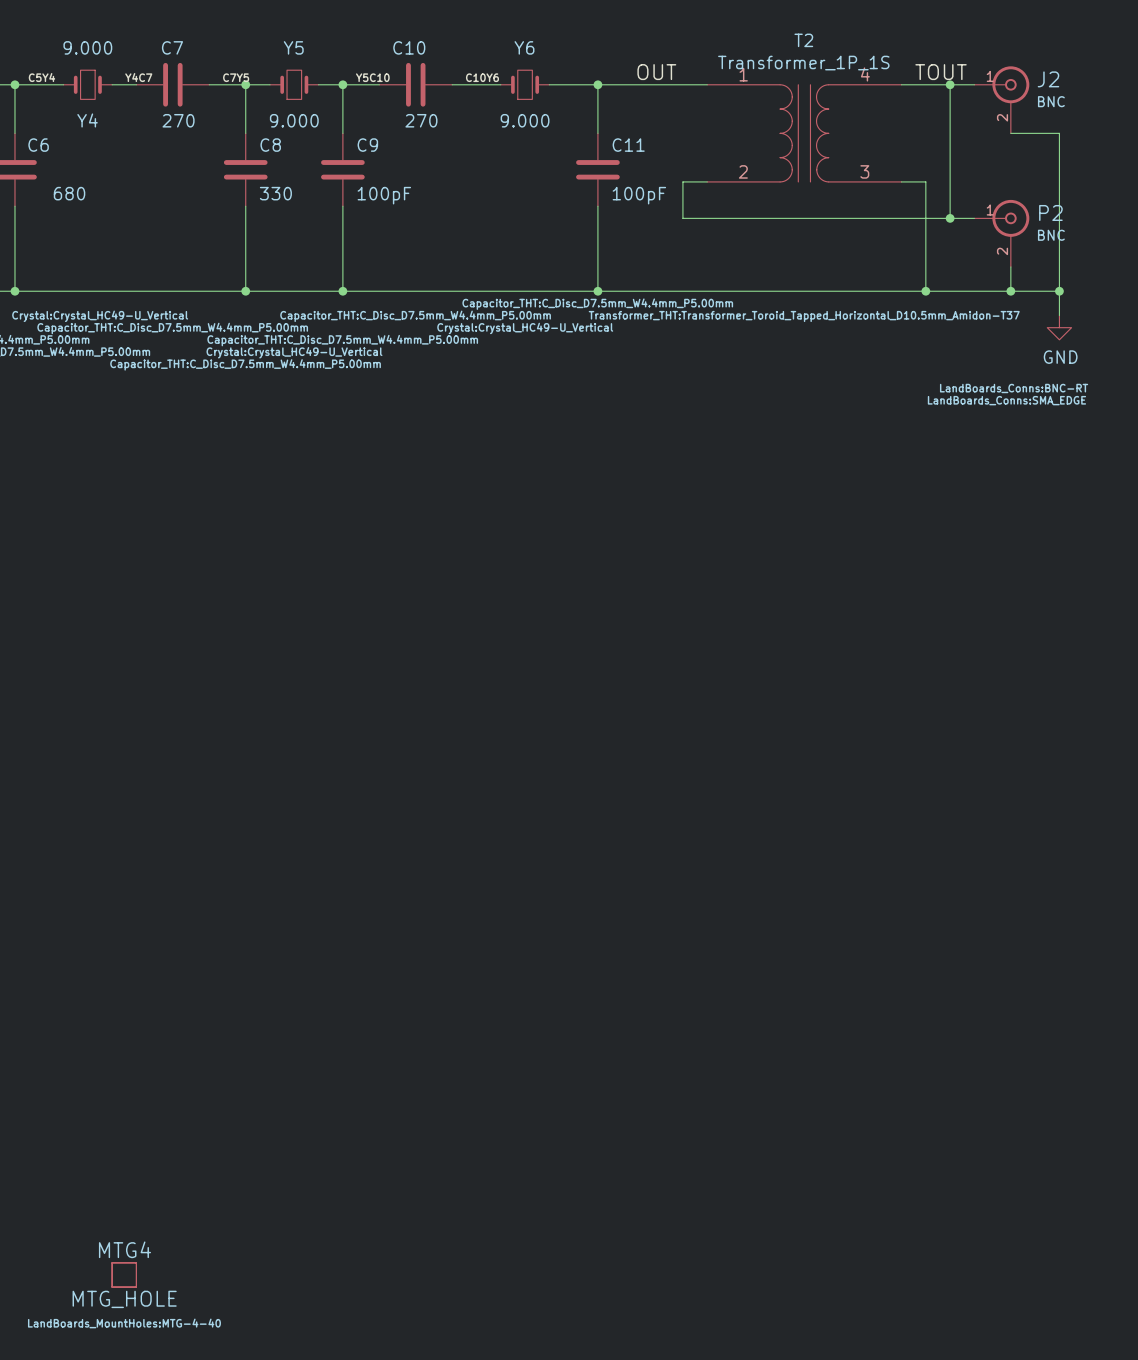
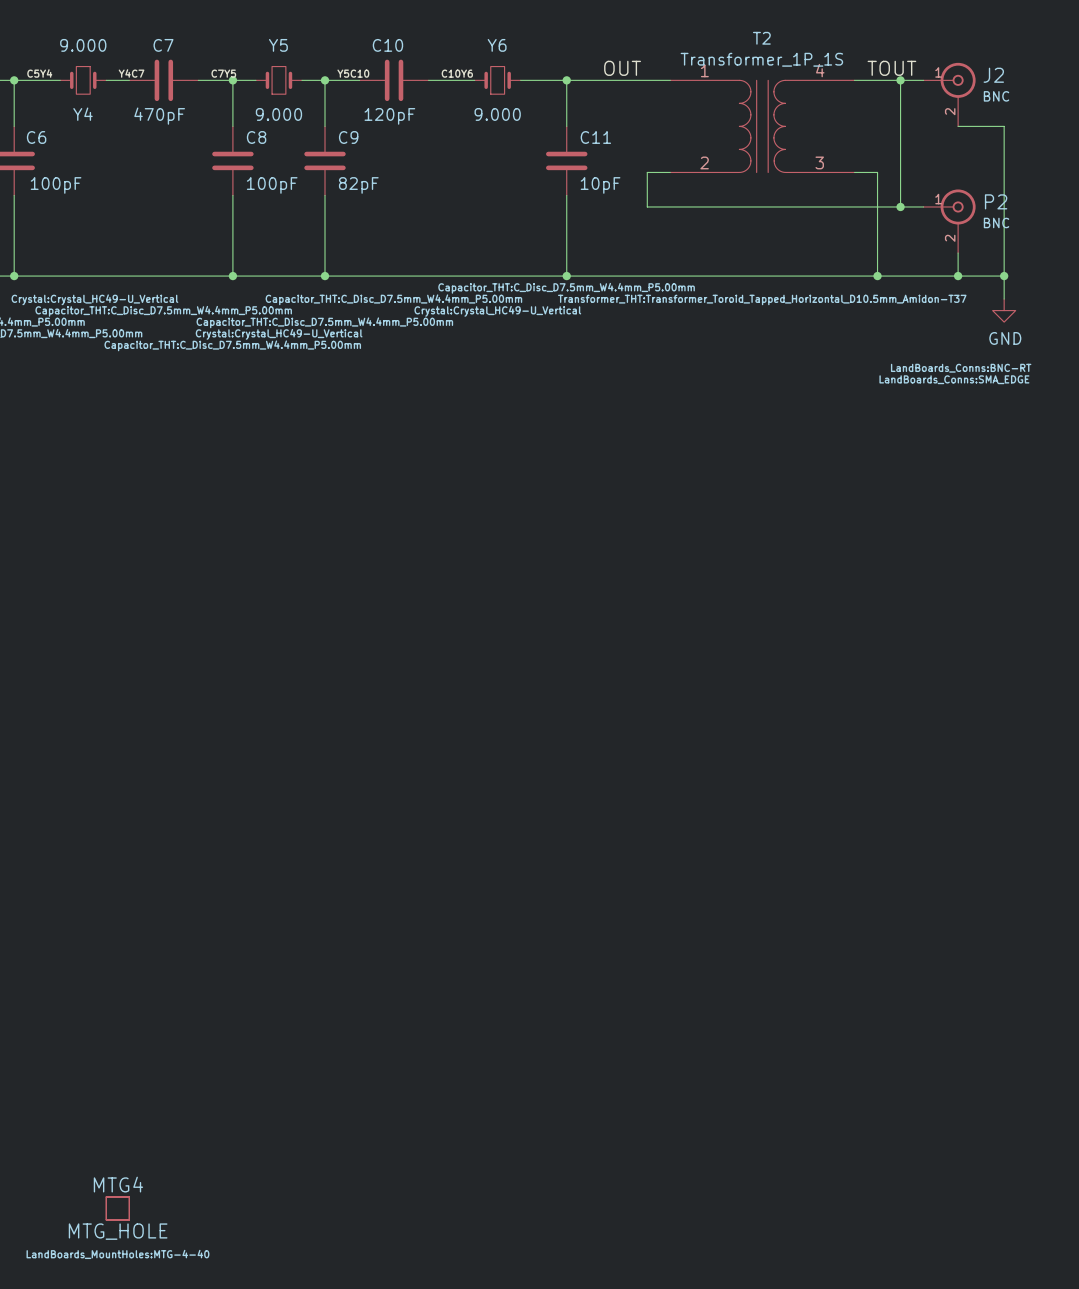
C7 value: 270 (178, 120) -> 470pF (159, 116)
C10 value: 270 (421, 120) -> 120pF (389, 116)
C6 value: 680 (69, 193) -> 100pF (56, 185)
C8 value: 330 (275, 193) -> 100pF (272, 185)
C9 value: 100pF (384, 195) -> 82pF (358, 185)
C11 value: 100pF (639, 195) -> 10pF (600, 185)

